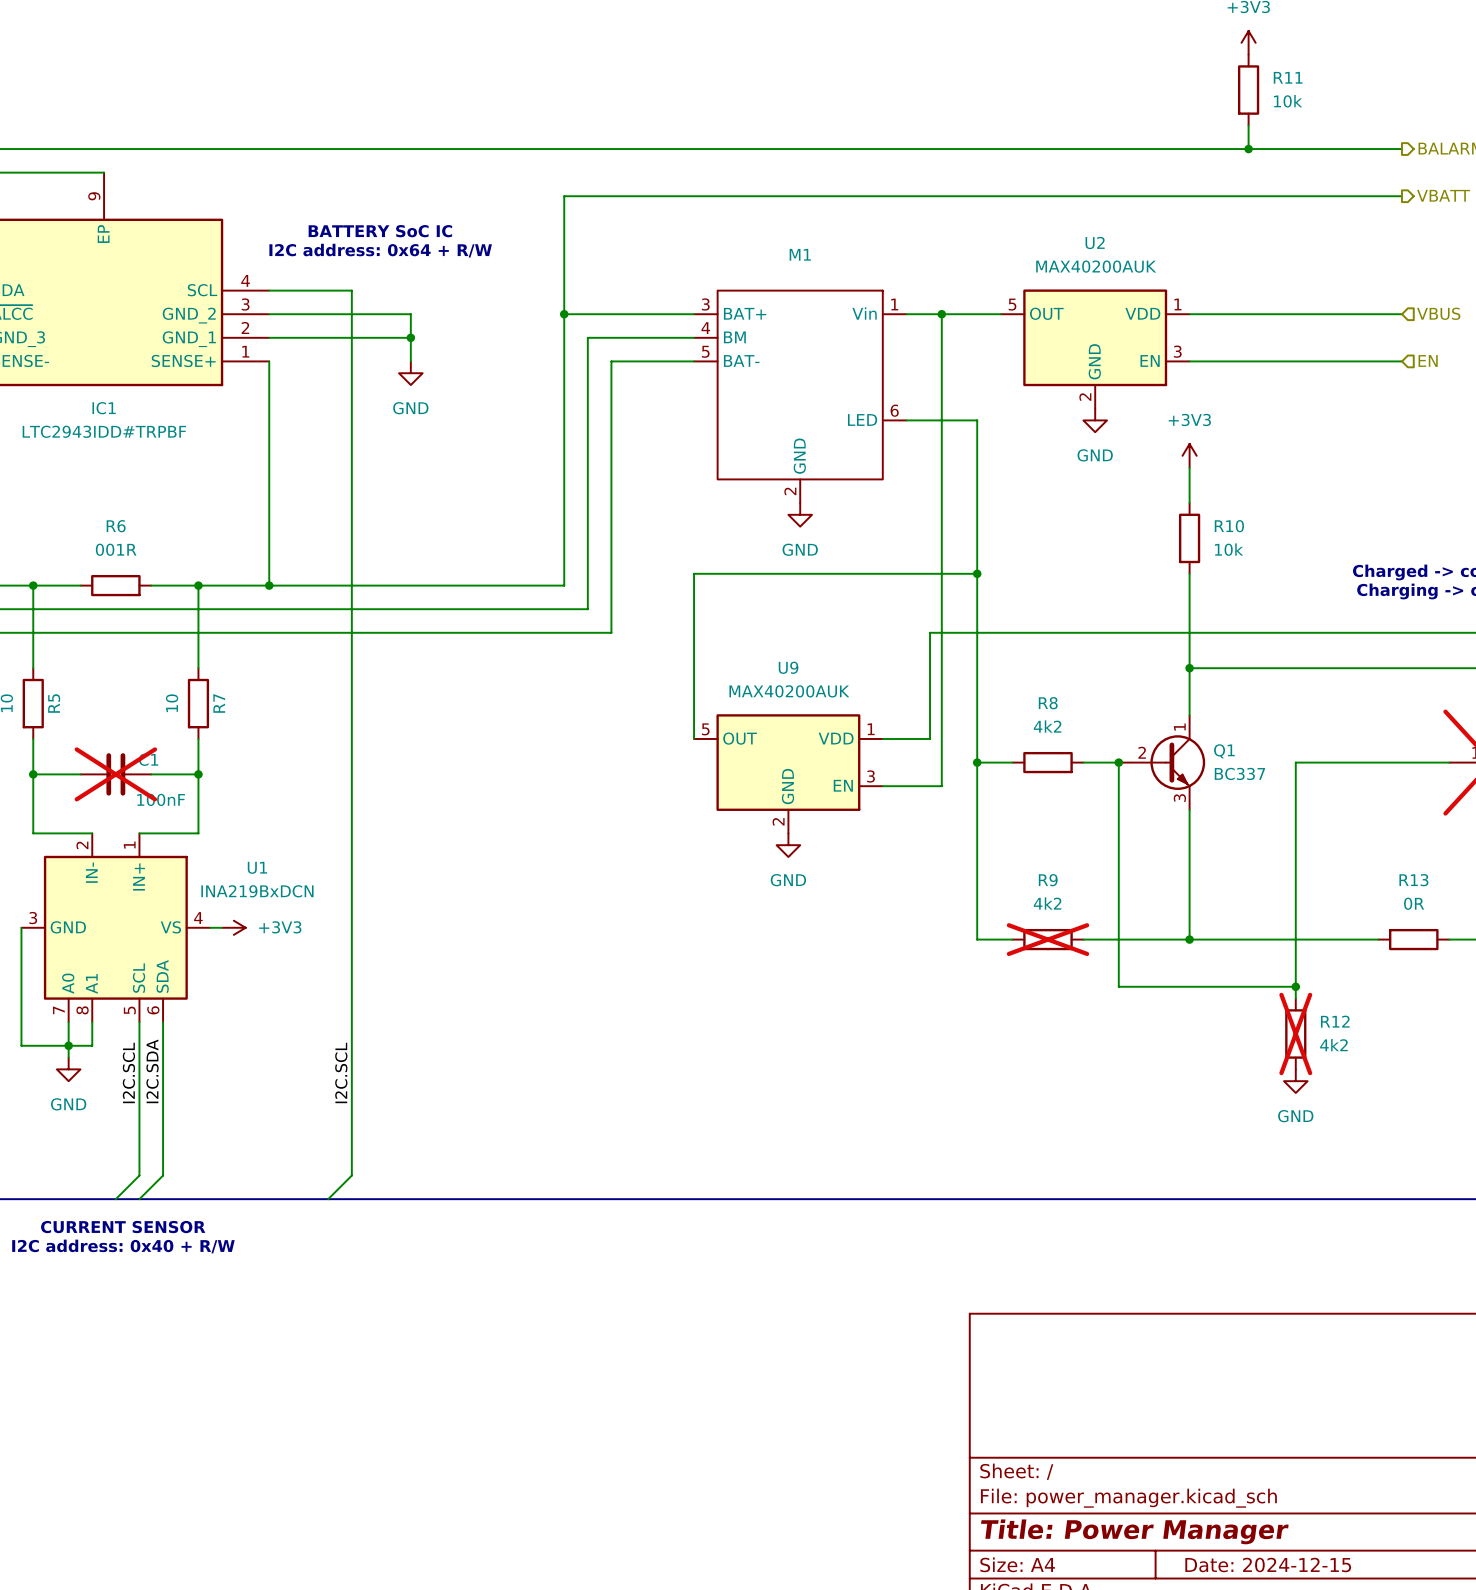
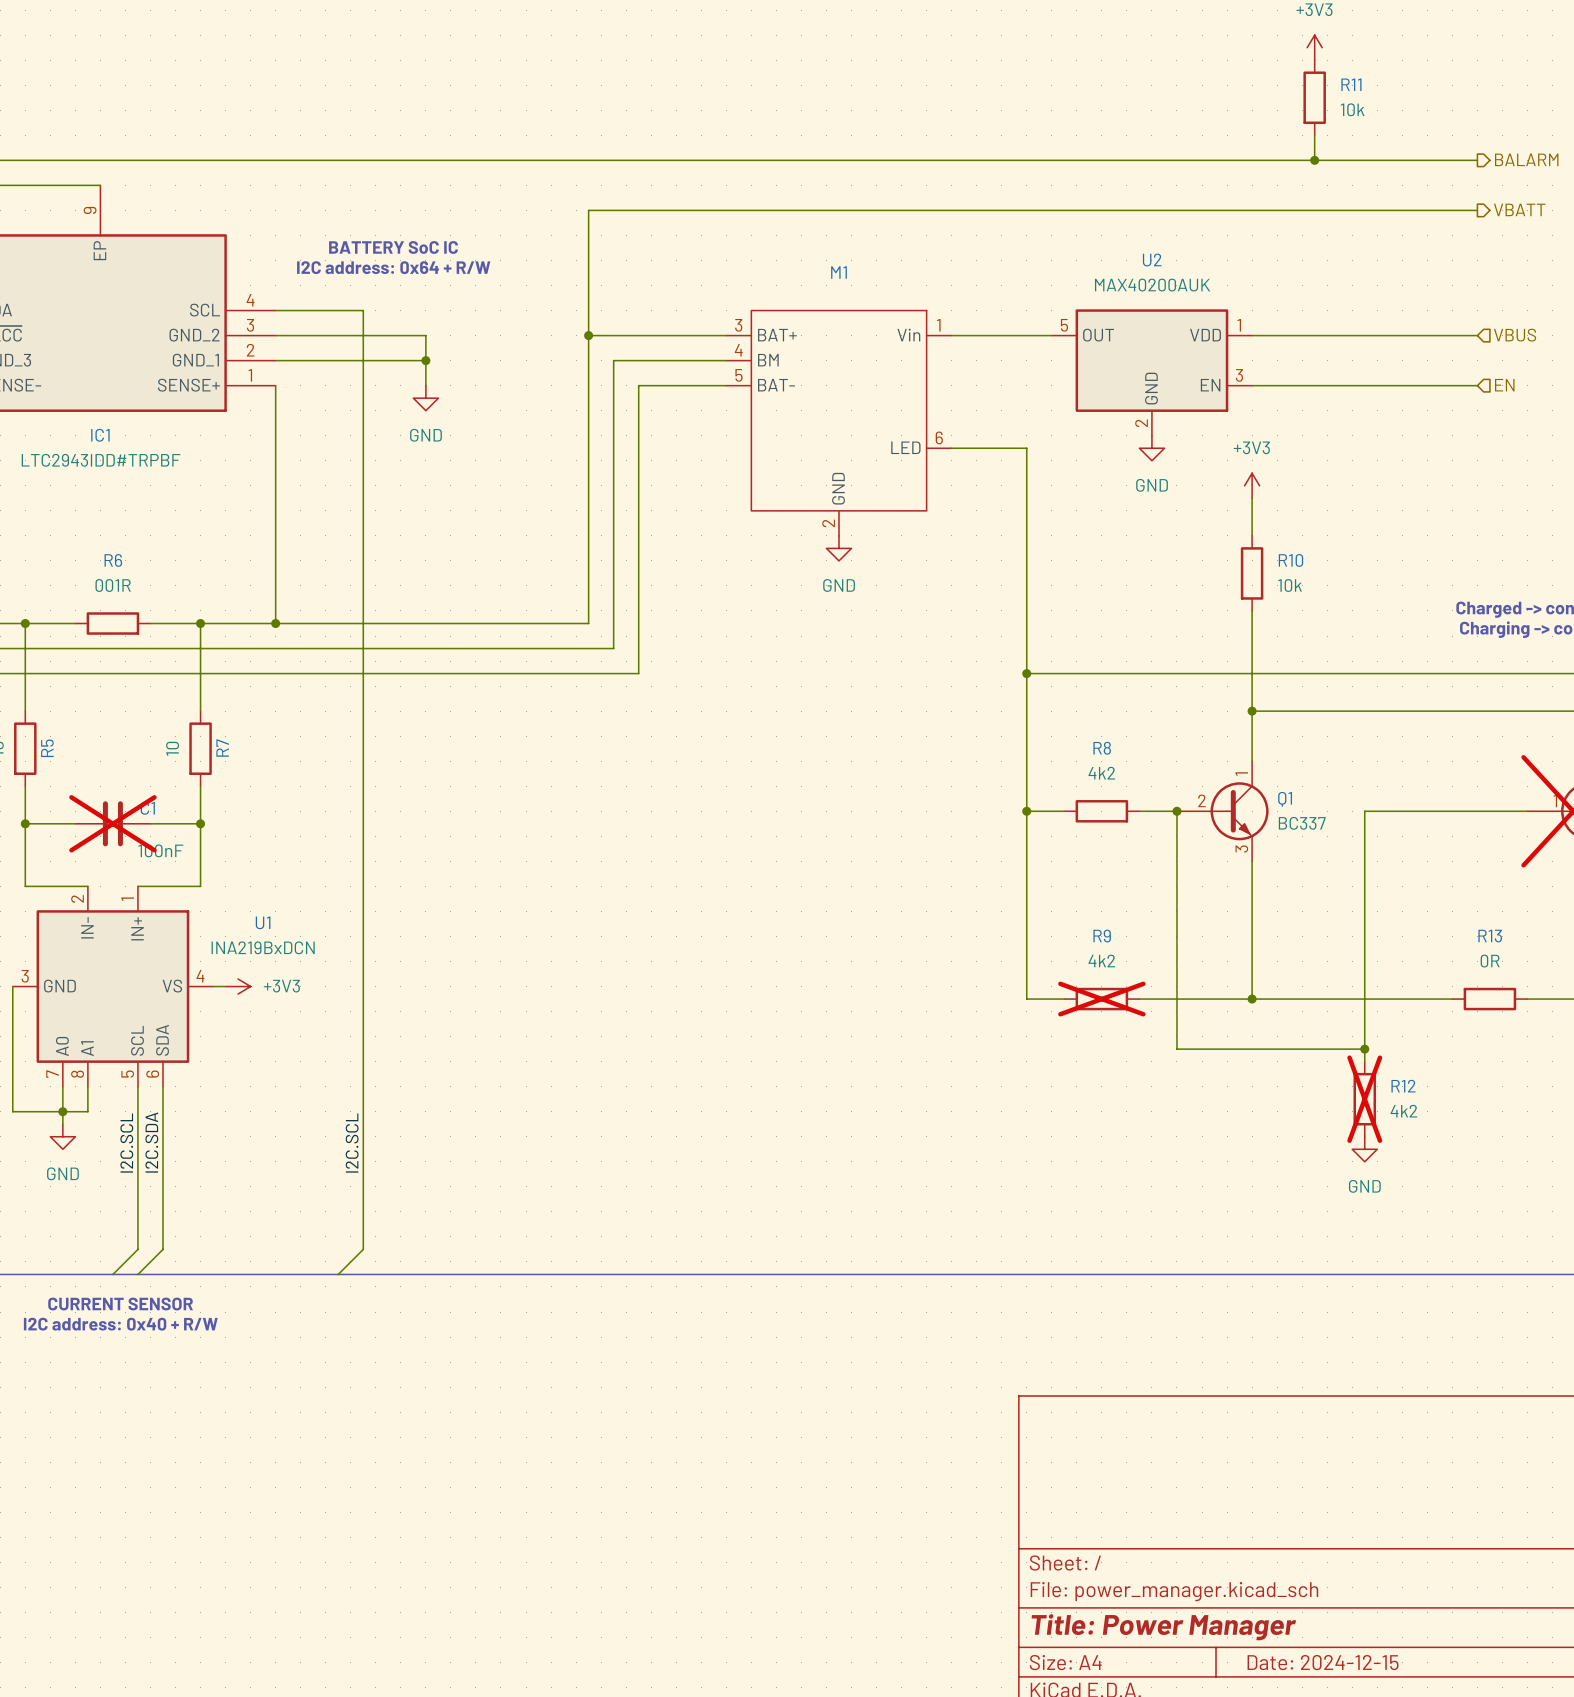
wire: (941, 314) (941, 786) (882, 786) -> none
junction: (941, 314) -> none
wire: (977, 573) (694, 573) (694, 738) -> none
junction: (977, 573) -> none
wire: (977, 632) (930, 632) (930, 738) (882, 738) -> none
junction: none -> (1026, 673)
U9: MAX40200AUK (788, 773) -> none
power symbol: GND (788, 845) -> none

